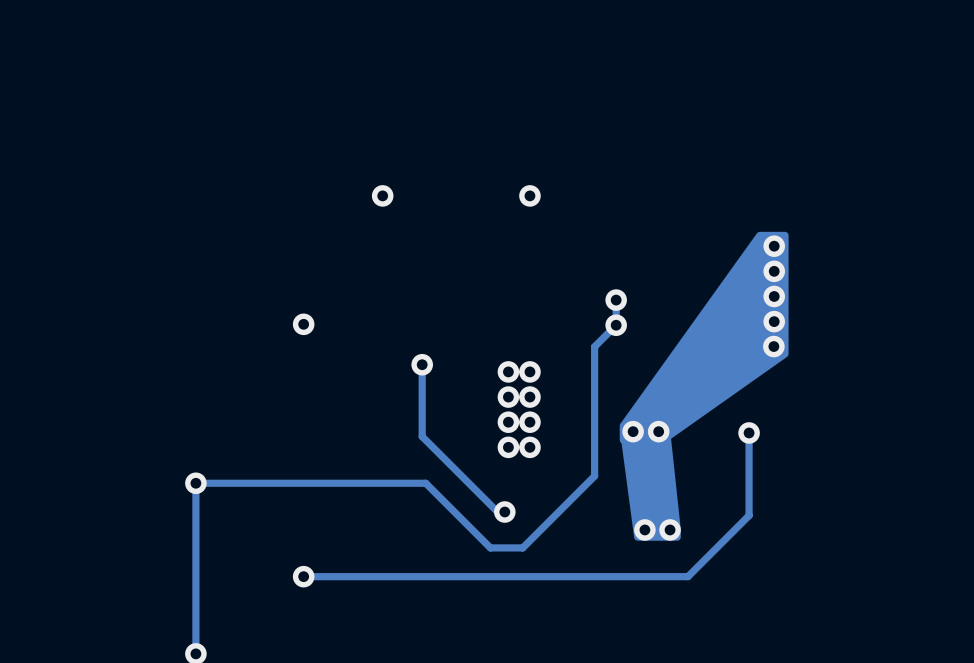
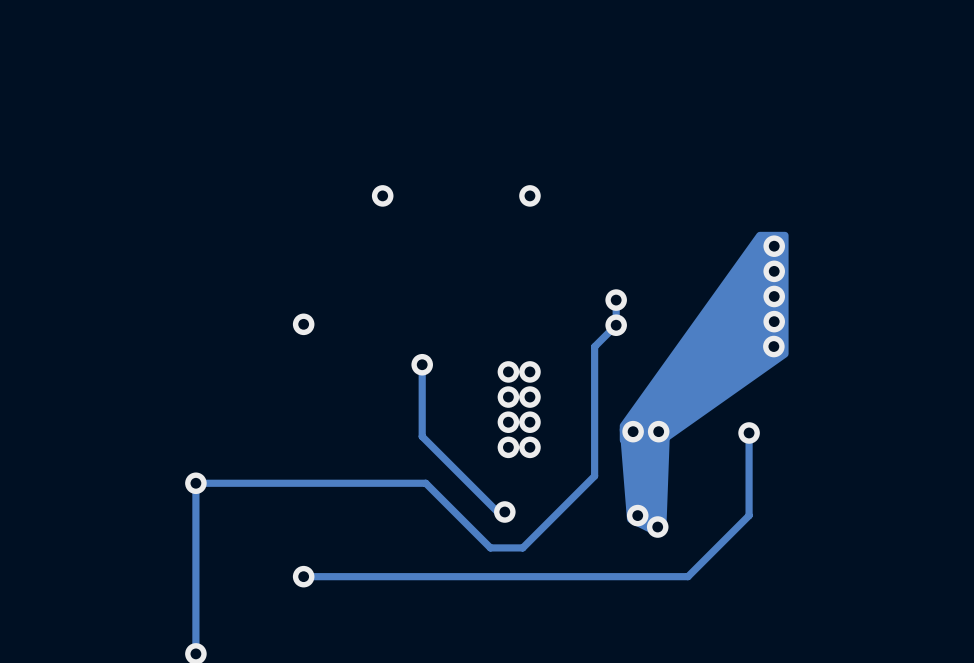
drawing shape: [619, 425, 681, 541] -> [619, 425, 671, 538]
via: none -> (637, 515)
via: none -> (657, 527)
via: (644, 529) -> none
via: (670, 529) -> none

